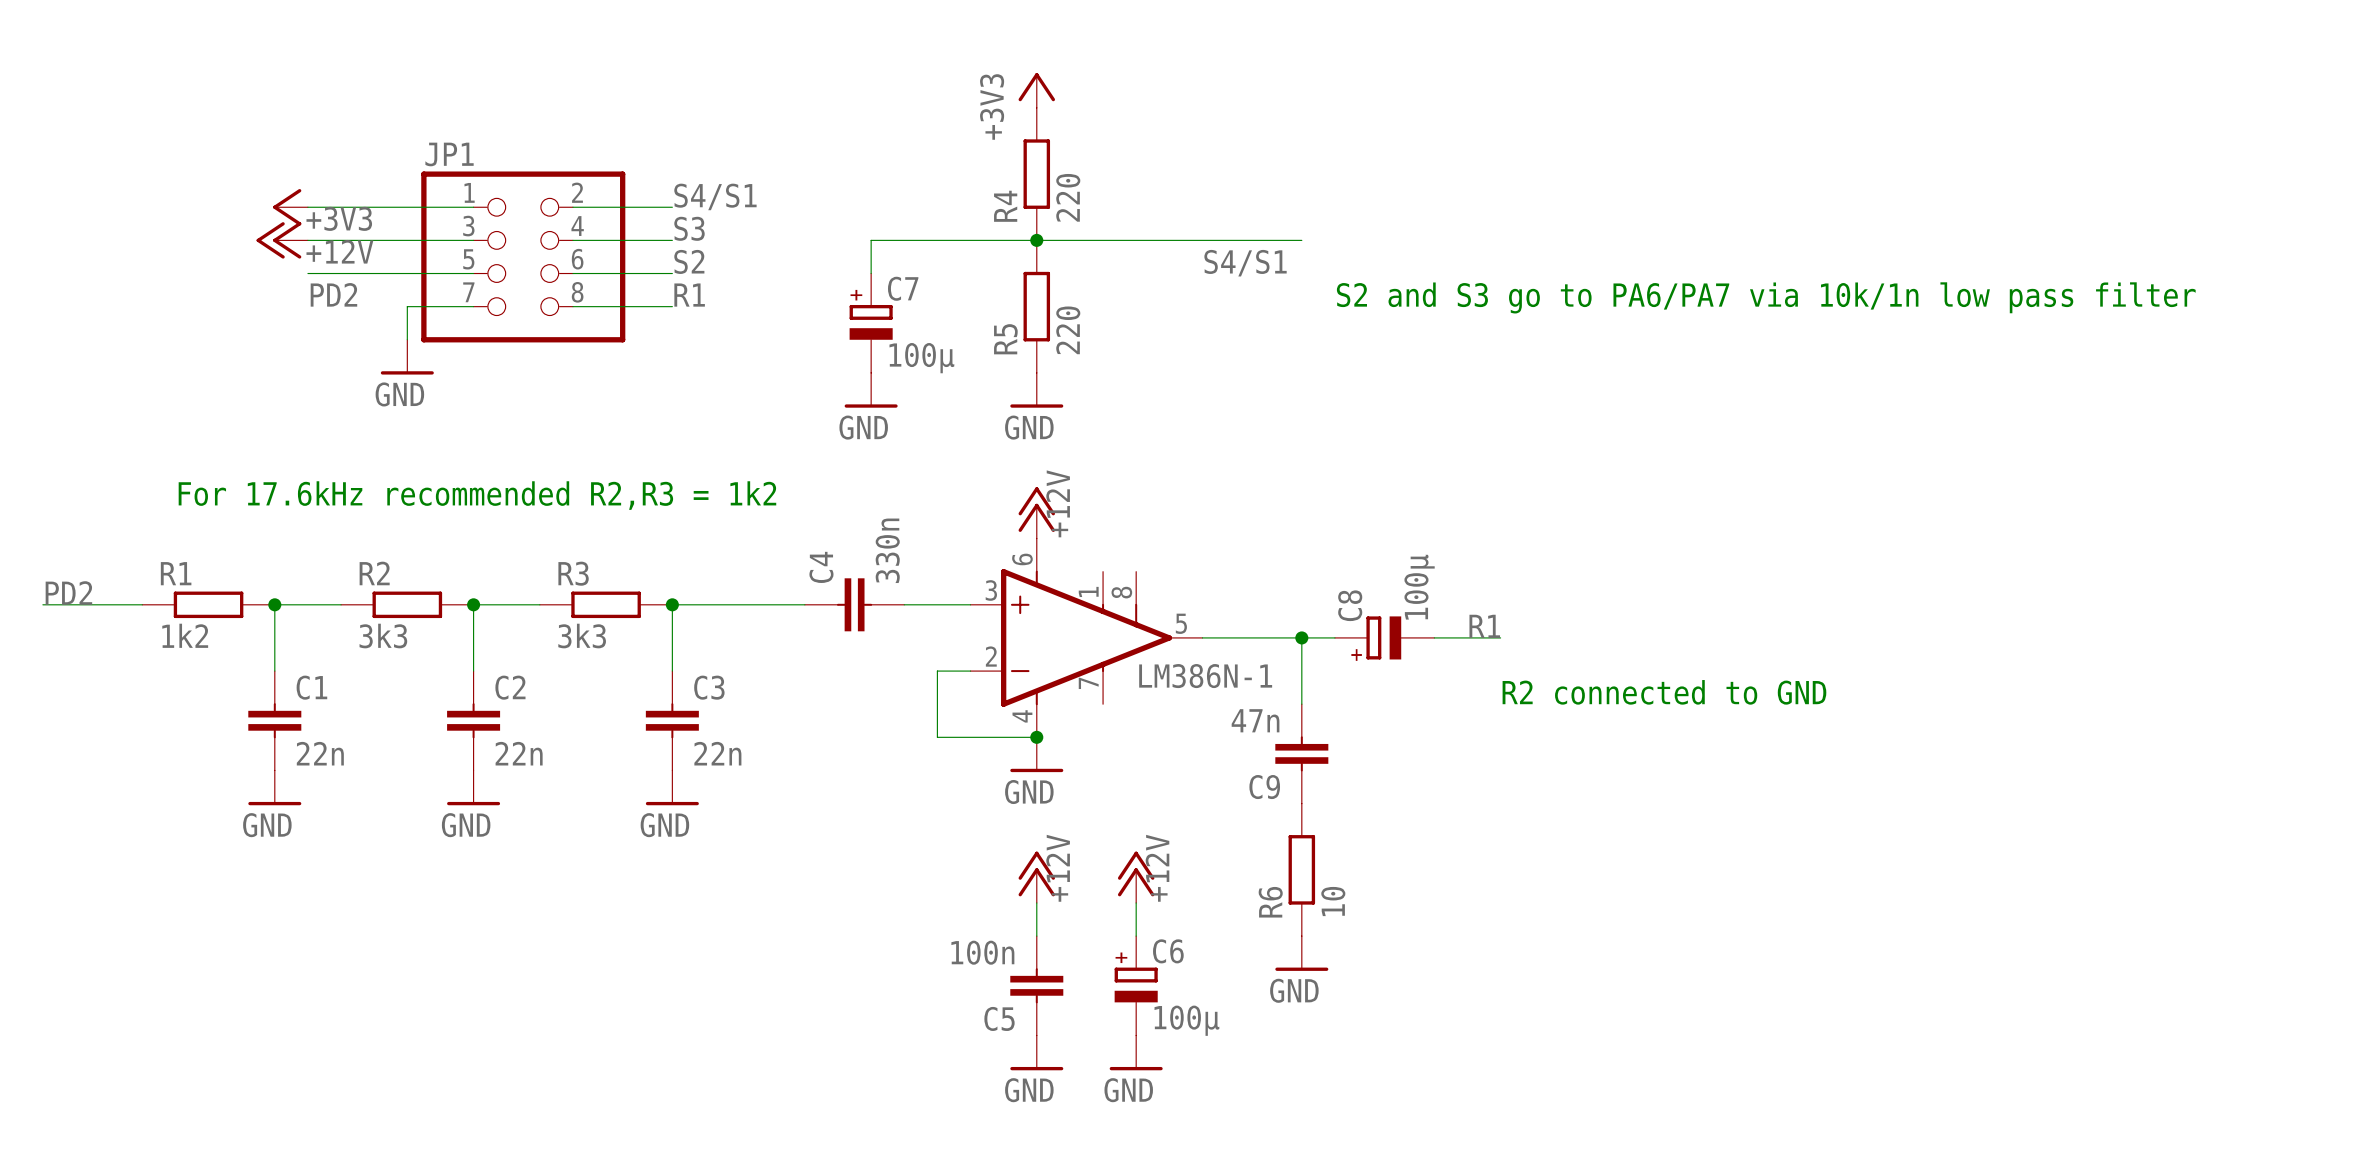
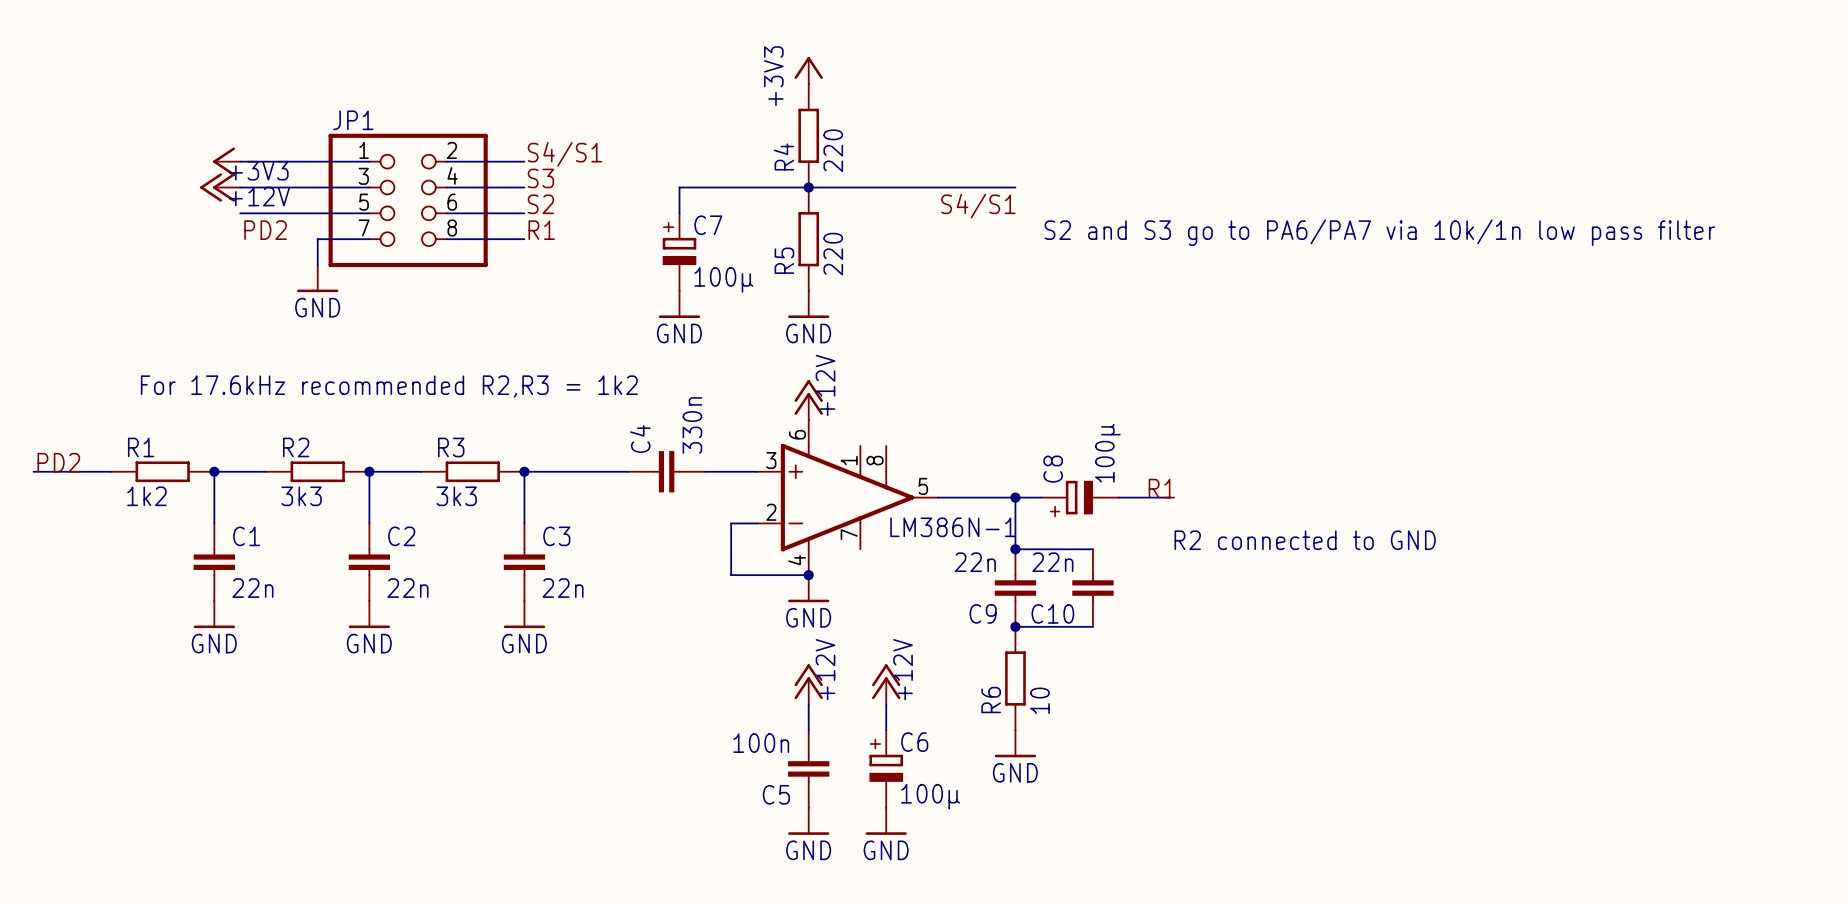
wire: none -> (1015, 549) (1092, 549)
junction: none -> (1015, 549)
C9 value: 47n (1255, 720) -> 22n (975, 562)
C10: none -> 22n (1092, 588)
wire: none -> (1015, 626) (1092, 626)
junction: none -> (1015, 626)

